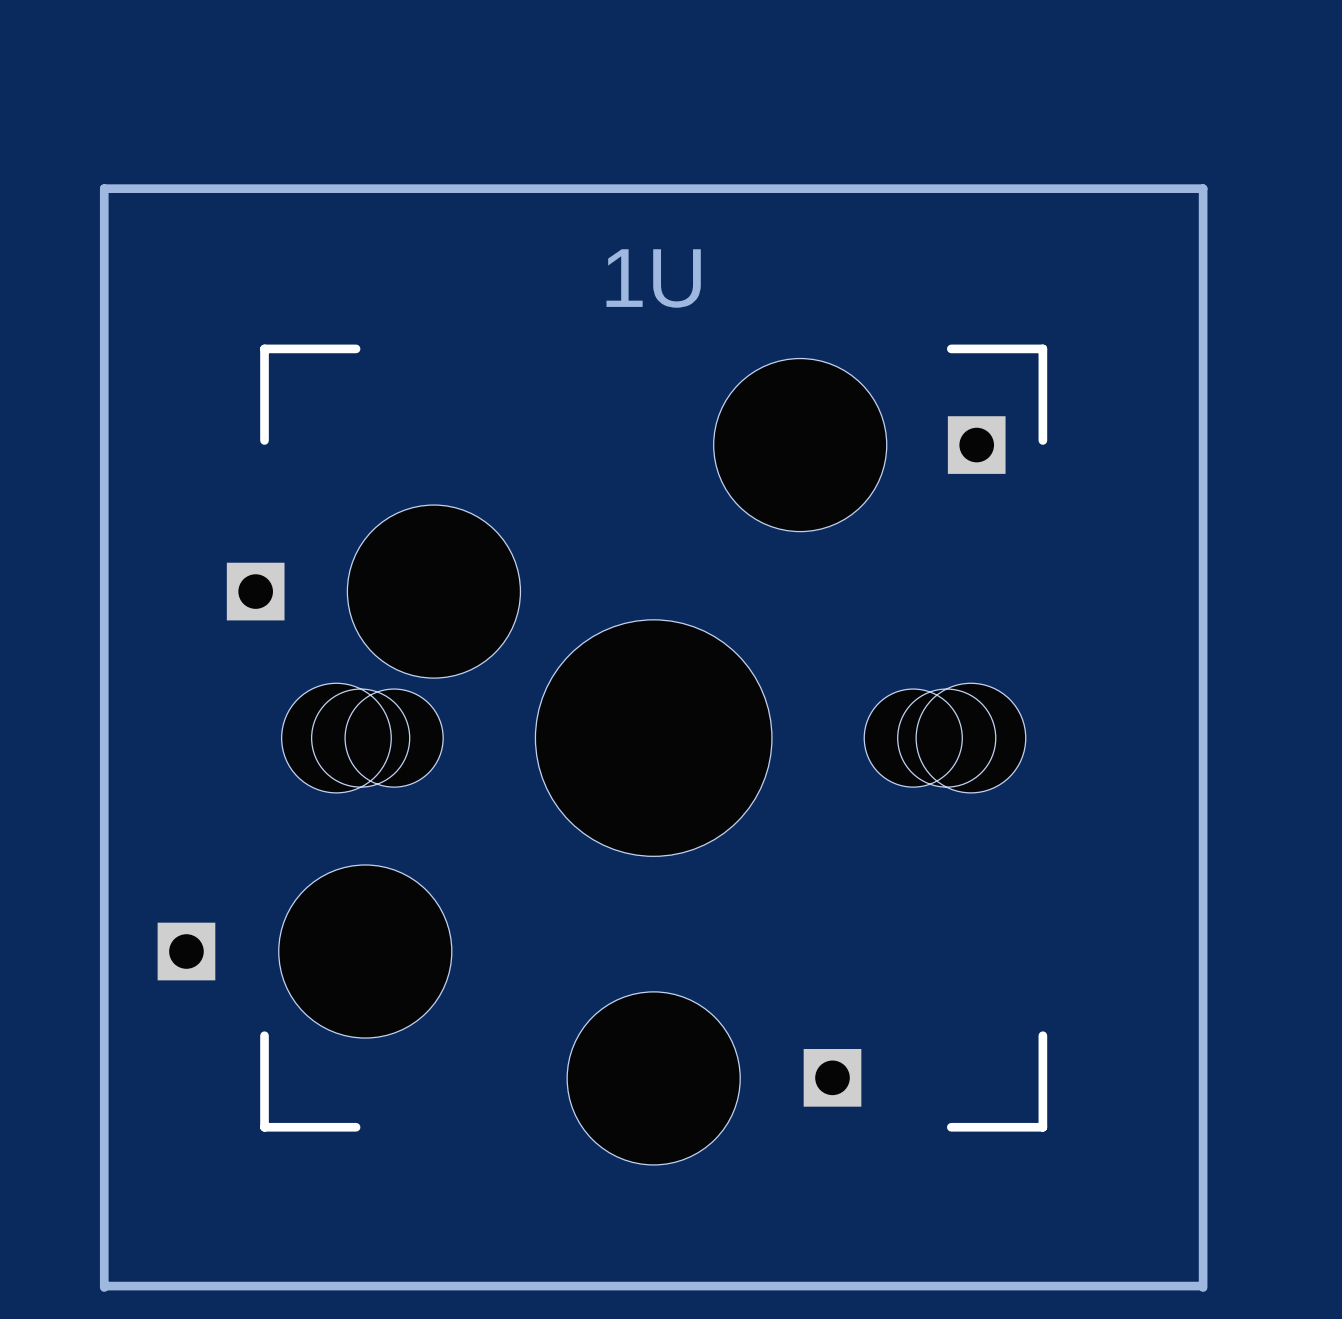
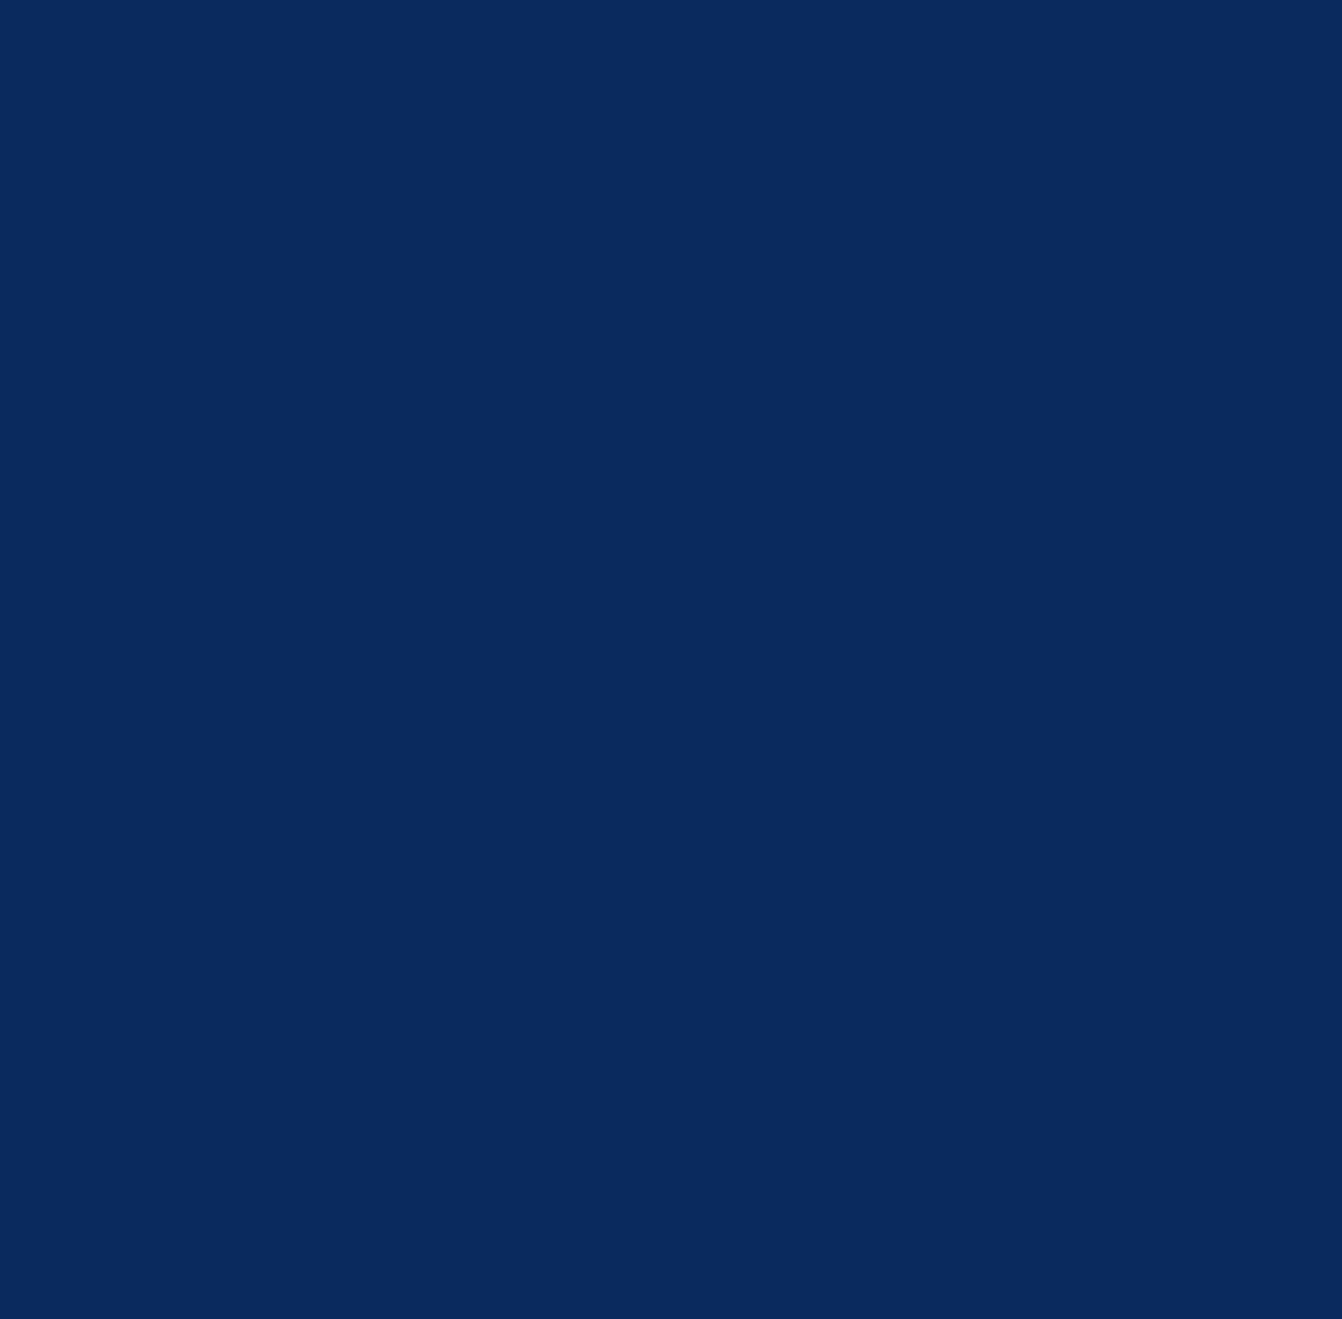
part: (653, 738) -> none

